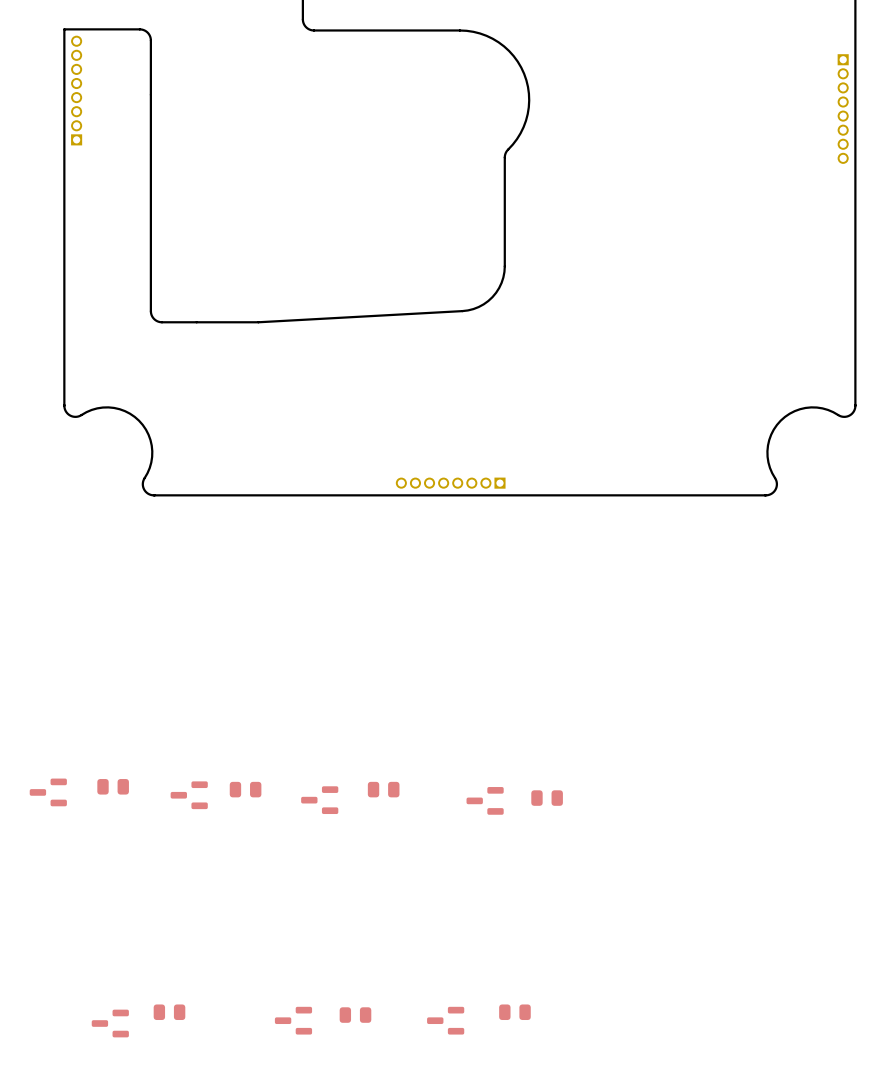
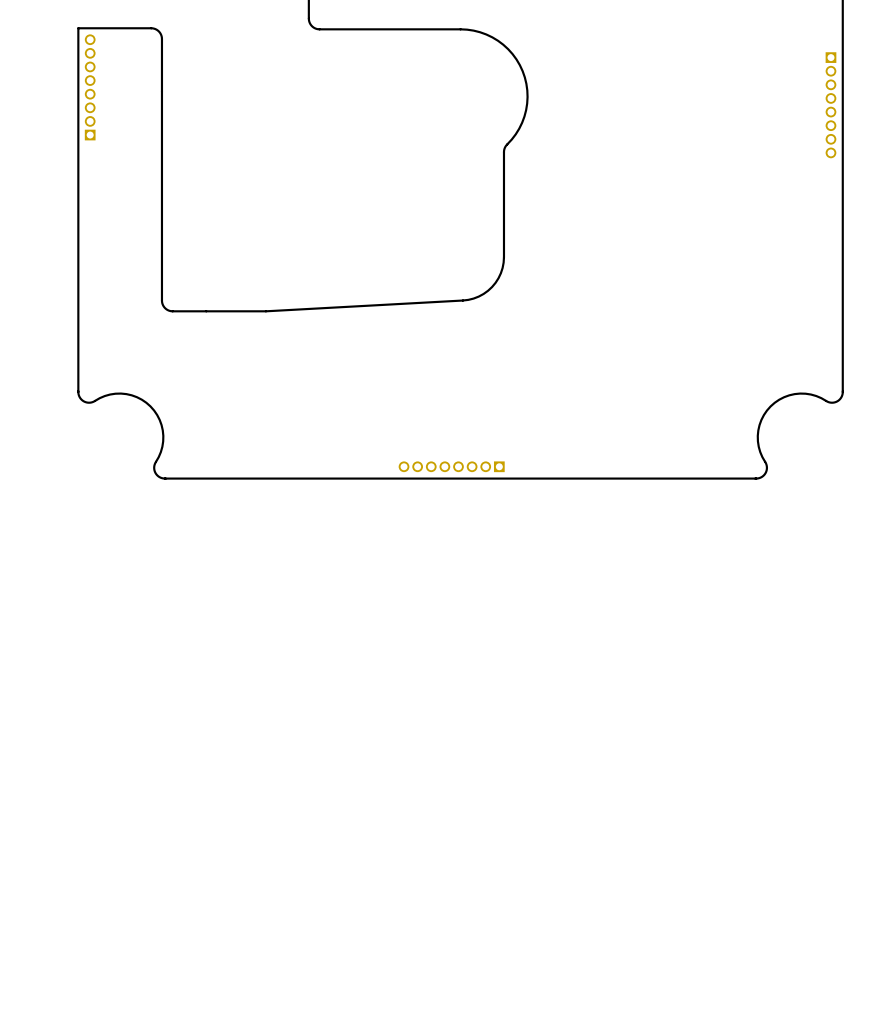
part: (113, 786) -> none
part: (245, 789) -> none
part: (383, 789) -> none
part: (48, 792) -> none
part: (189, 795) -> none
part: (547, 798) -> none
part: (319, 800) -> none
part: (485, 800) -> none
part: (169, 1012) -> none
part: (514, 1012) -> none
part: (355, 1015) -> none
part: (293, 1020) -> none
part: (445, 1020) -> none
part: (110, 1023) -> none

